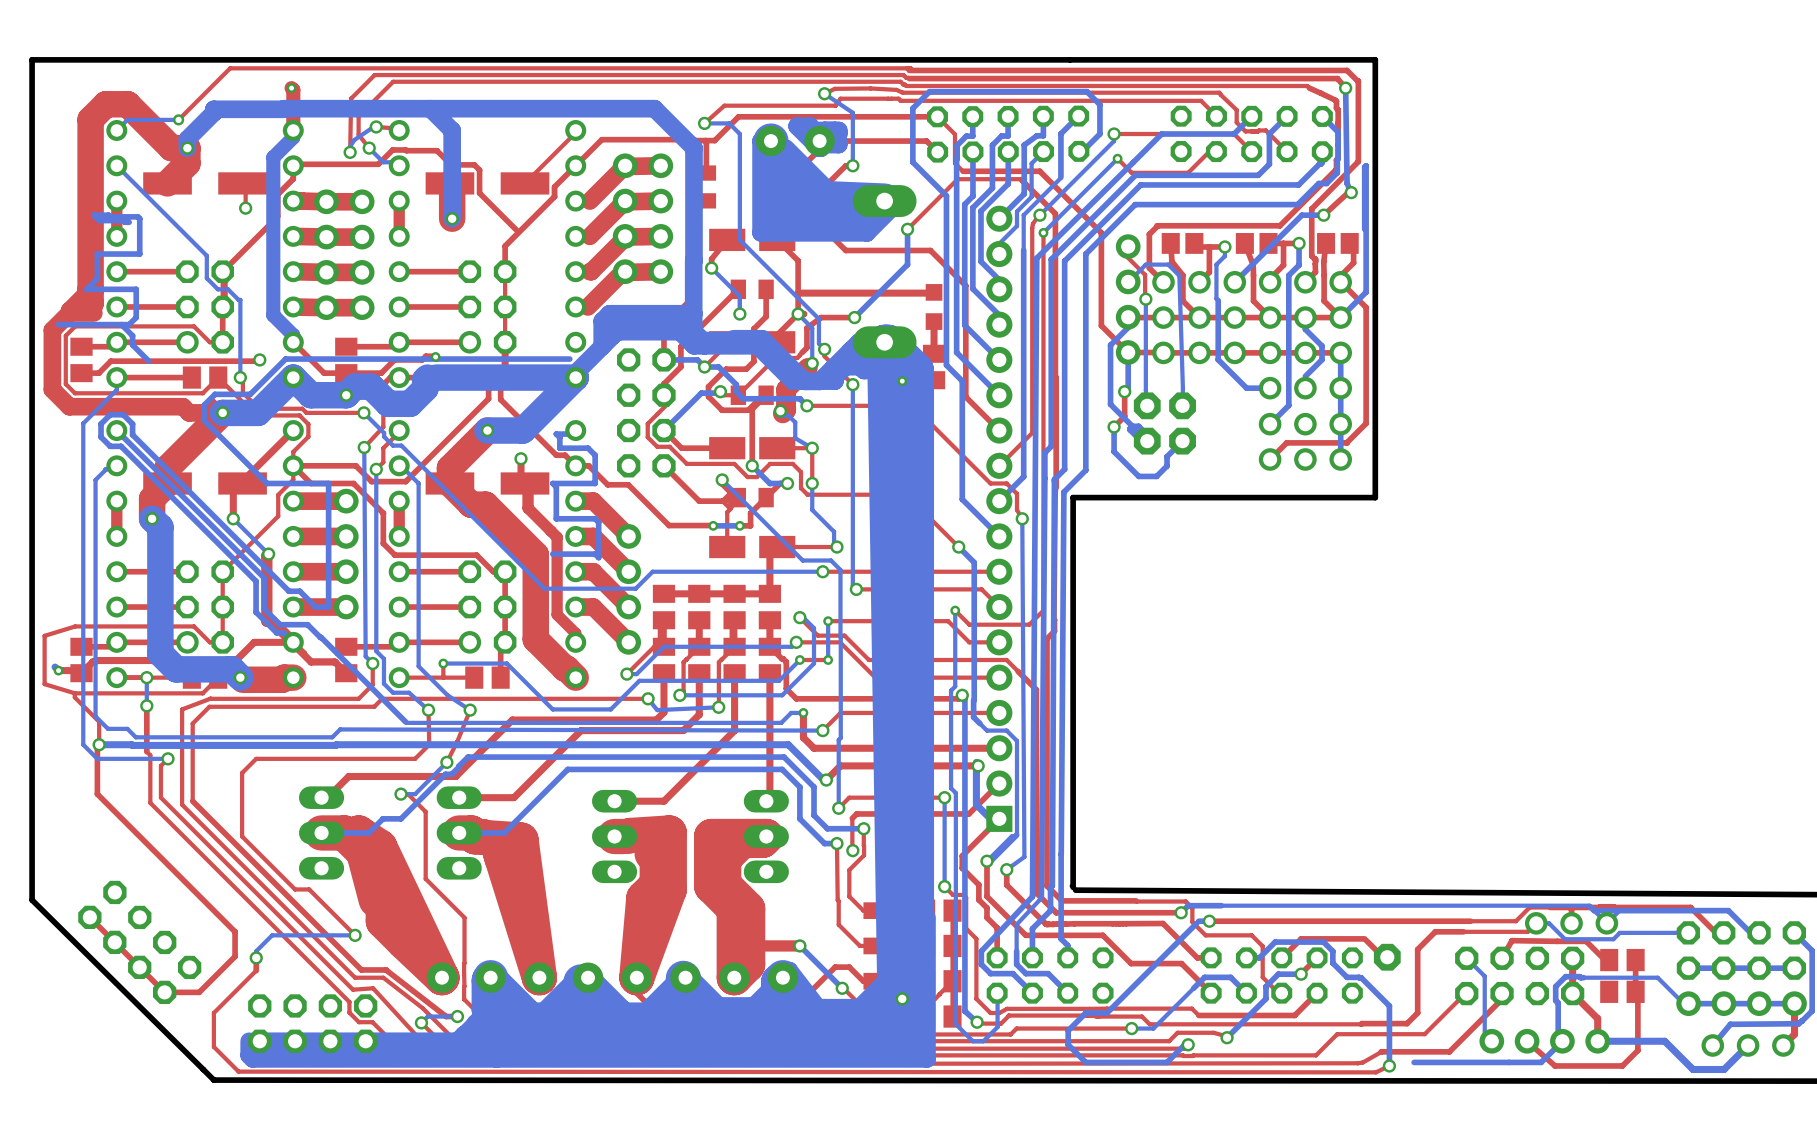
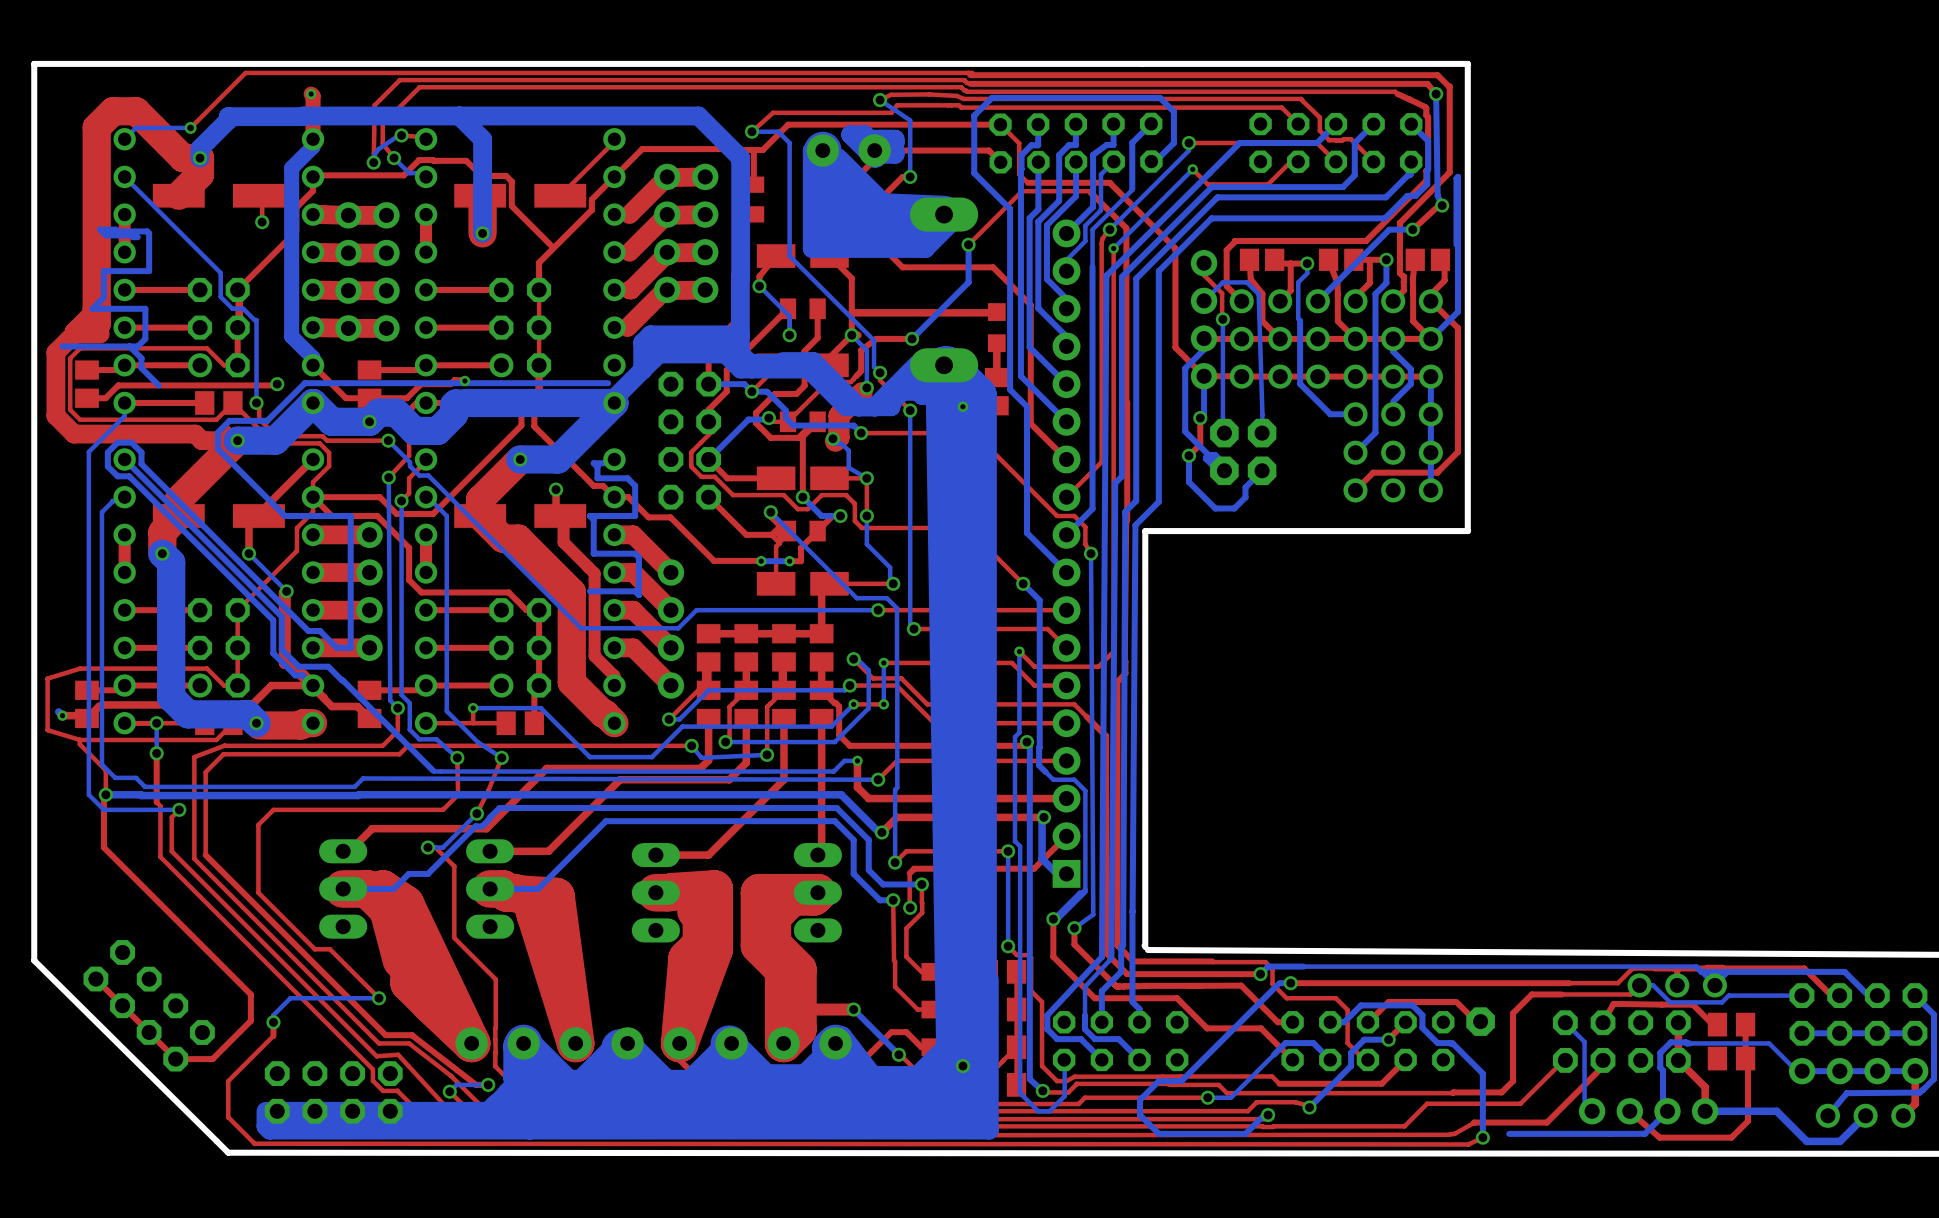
top track: (999, 818) (962, 855) (962, 868) (978, 884) (978, 899) (986, 908) (986, 917) (997, 927) (997, 957) -> none

